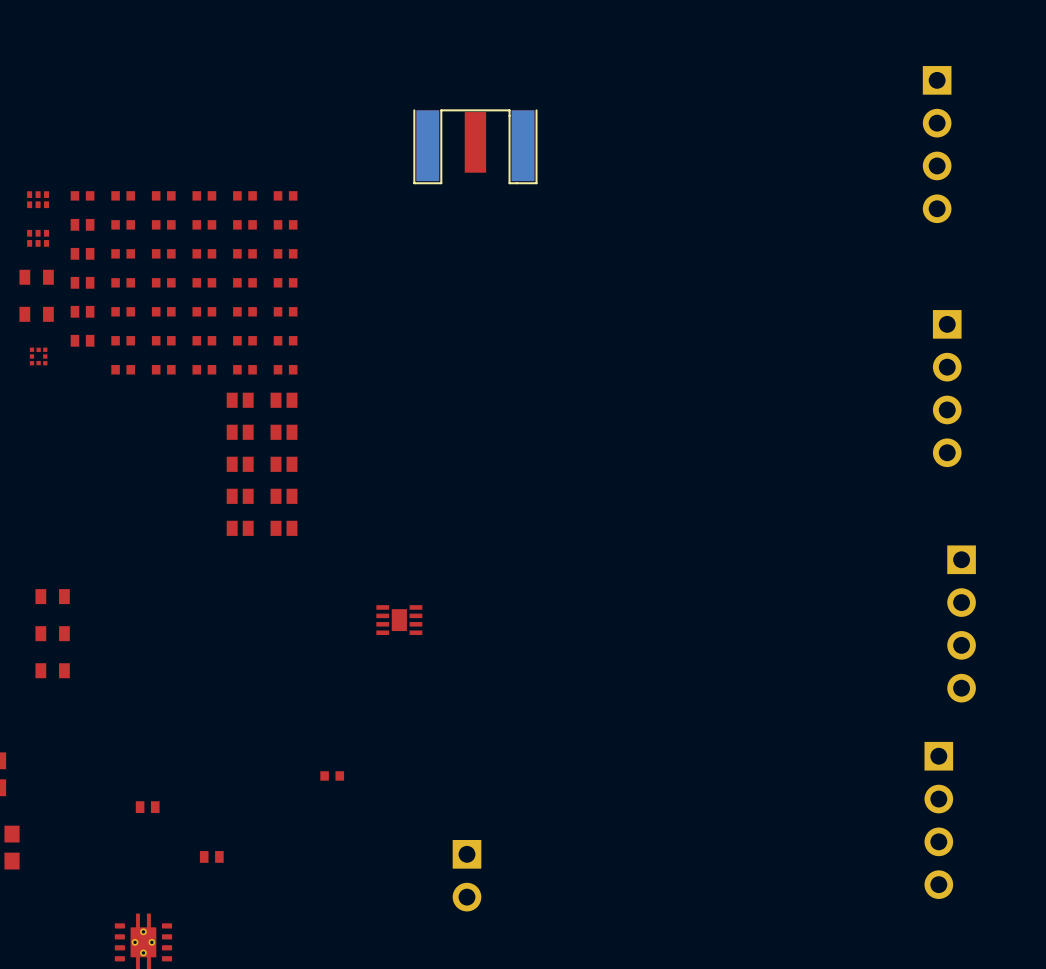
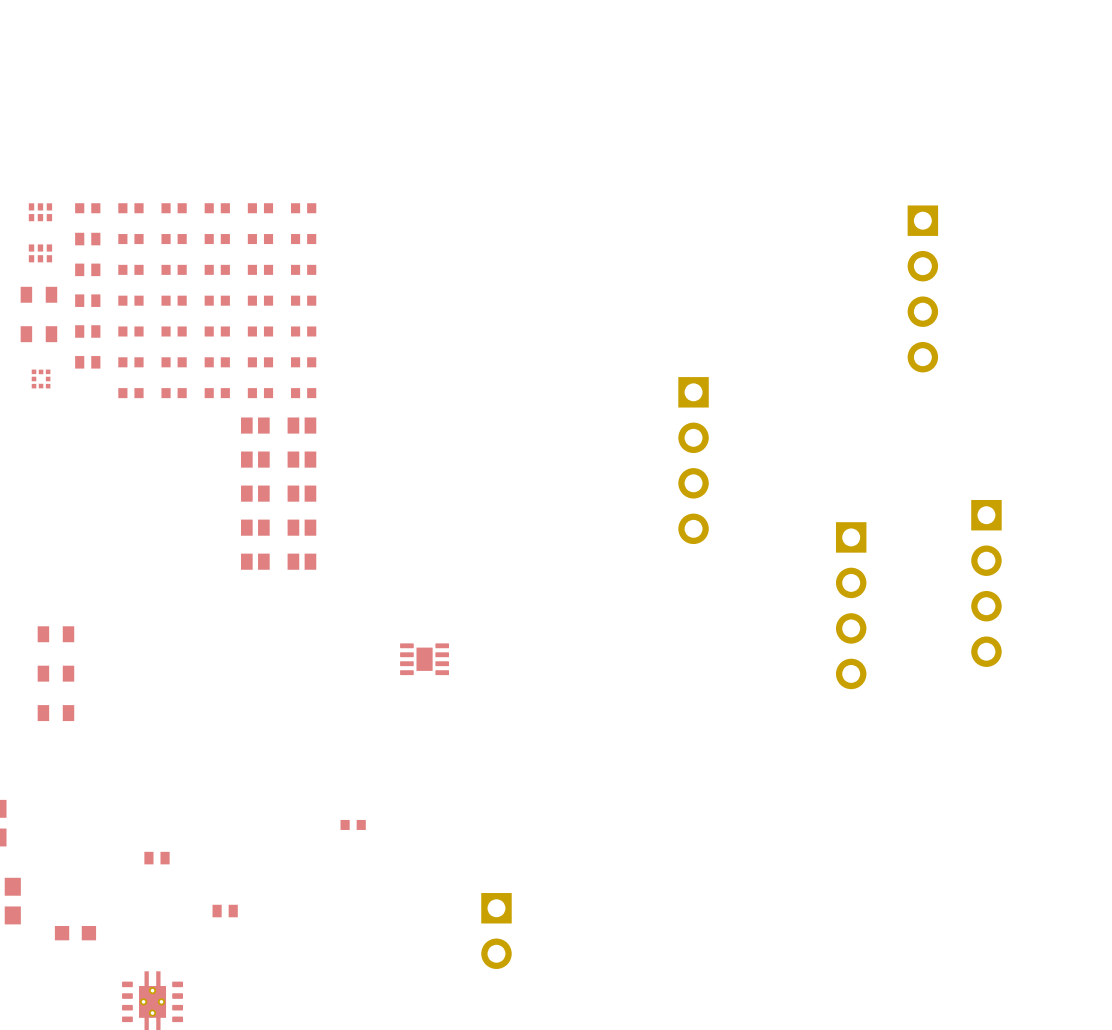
part: (937, 144) -> none
part: (475, 146) -> none
part: none -> (922, 288)
part: (947, 388) -> none
part: none -> (693, 460)
part: none -> (986, 583)
part: none -> (851, 605)
part: (961, 623) -> none
part: (938, 820) -> none
part: none -> (75, 933)

